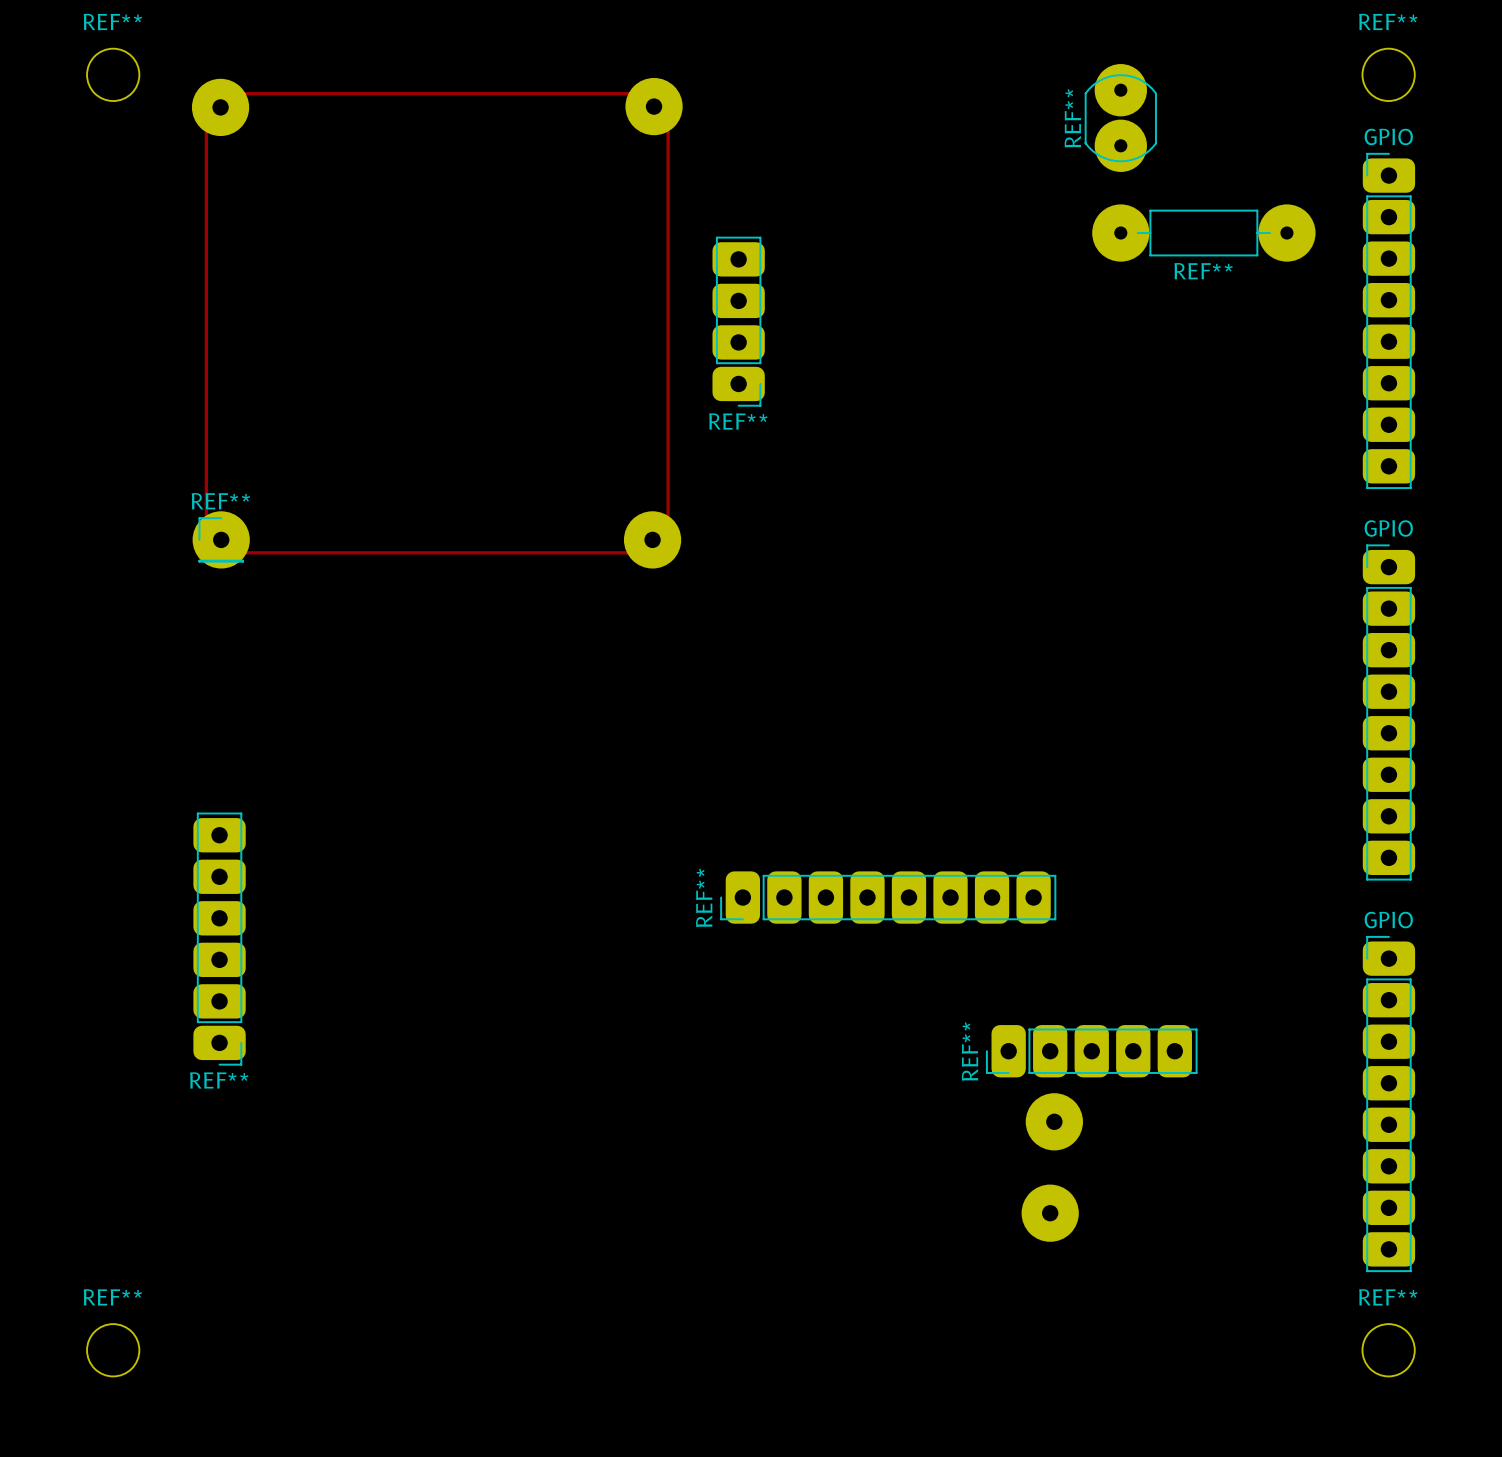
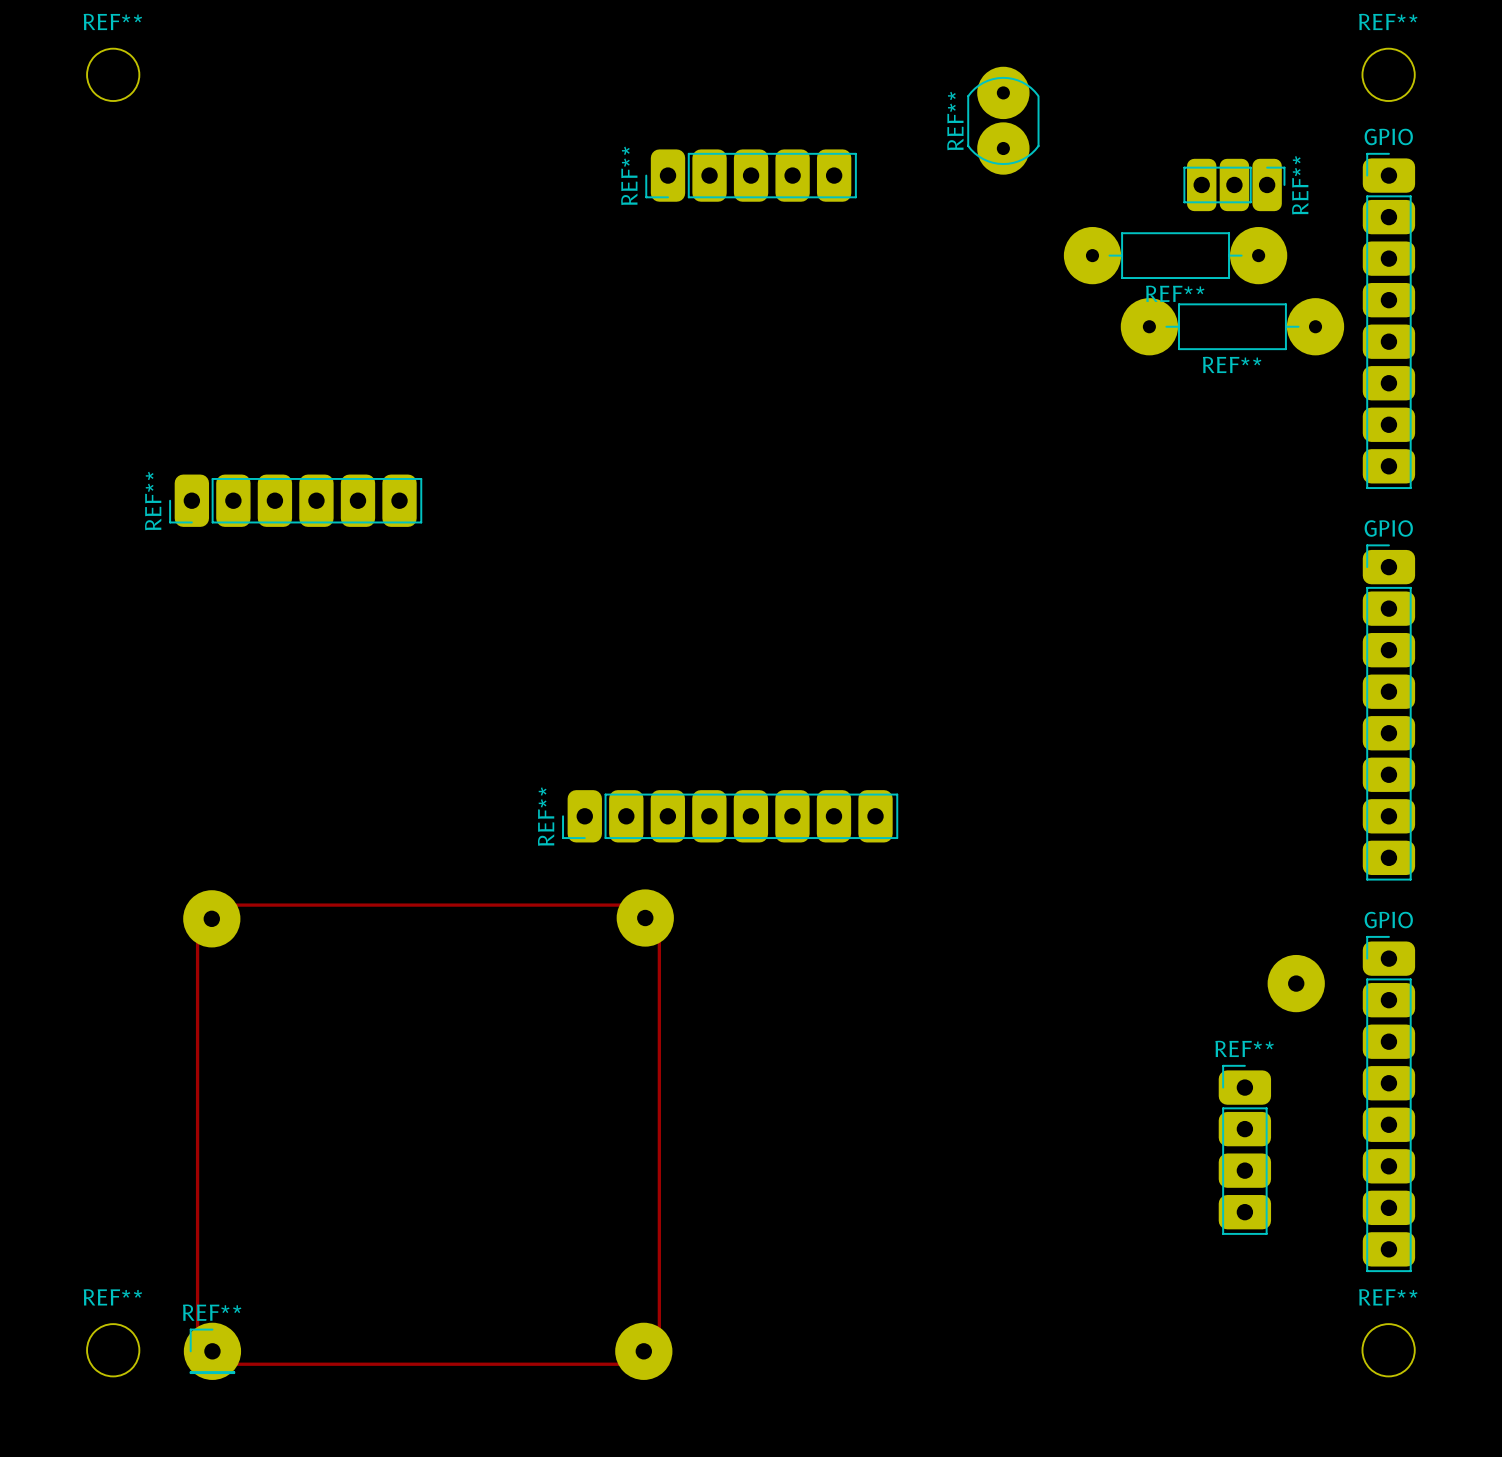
track: (206, 93) (206, 552) (668, 552) (668, 93) (206, 93) -> none
part: (654, 106) -> none
part: (220, 107) -> none
REF** position: (1120, 118) -> (1003, 120)
REF**: none -> (751, 175)
REF**: none -> (1234, 184)
REF** position: (1203, 233) -> (1175, 255)
REF**: (738, 321) -> none
REF**: none -> (1232, 326)
REF**: none -> (295, 500)
REF**: (221, 539) -> none
part: (652, 539) -> none
REF** position: (888, 897) -> (730, 816)
track: none -> (197, 905) (197, 1364) (659, 1364) (659, 905) (197, 905)
part: none -> (211, 918)
part: none -> (645, 918)
REF**: (219, 939) -> none
part: none -> (1296, 983)
REF**: (1091, 1051) -> none
part: (1054, 1121) -> none
REF**: none -> (1244, 1149)
part: (1050, 1213) -> none
REF**: none -> (212, 1351)
part: none -> (643, 1351)

